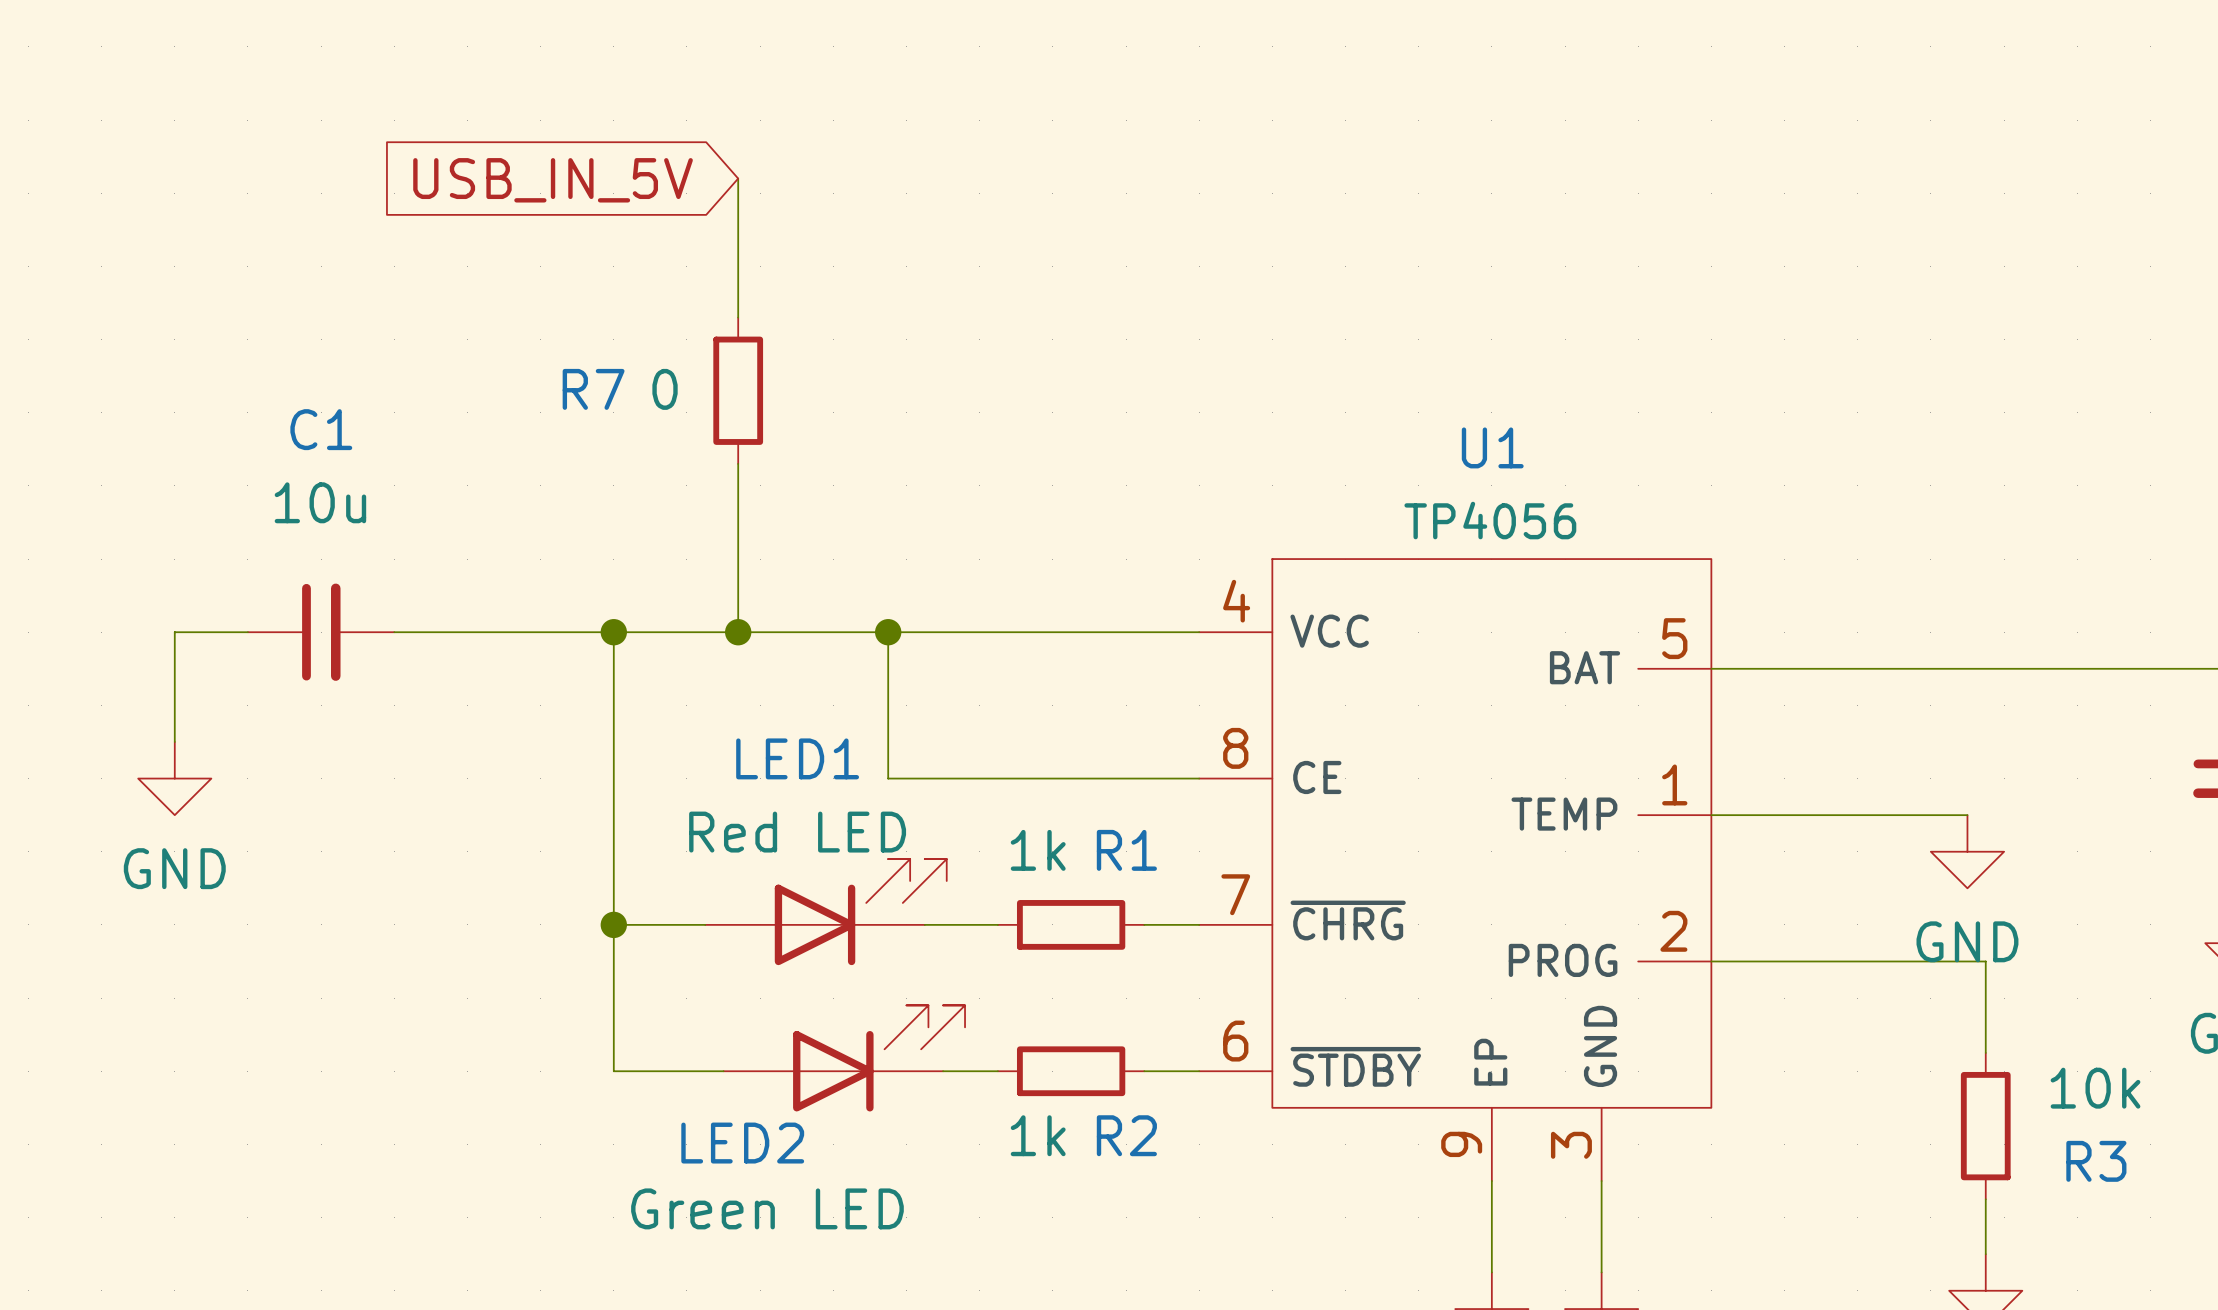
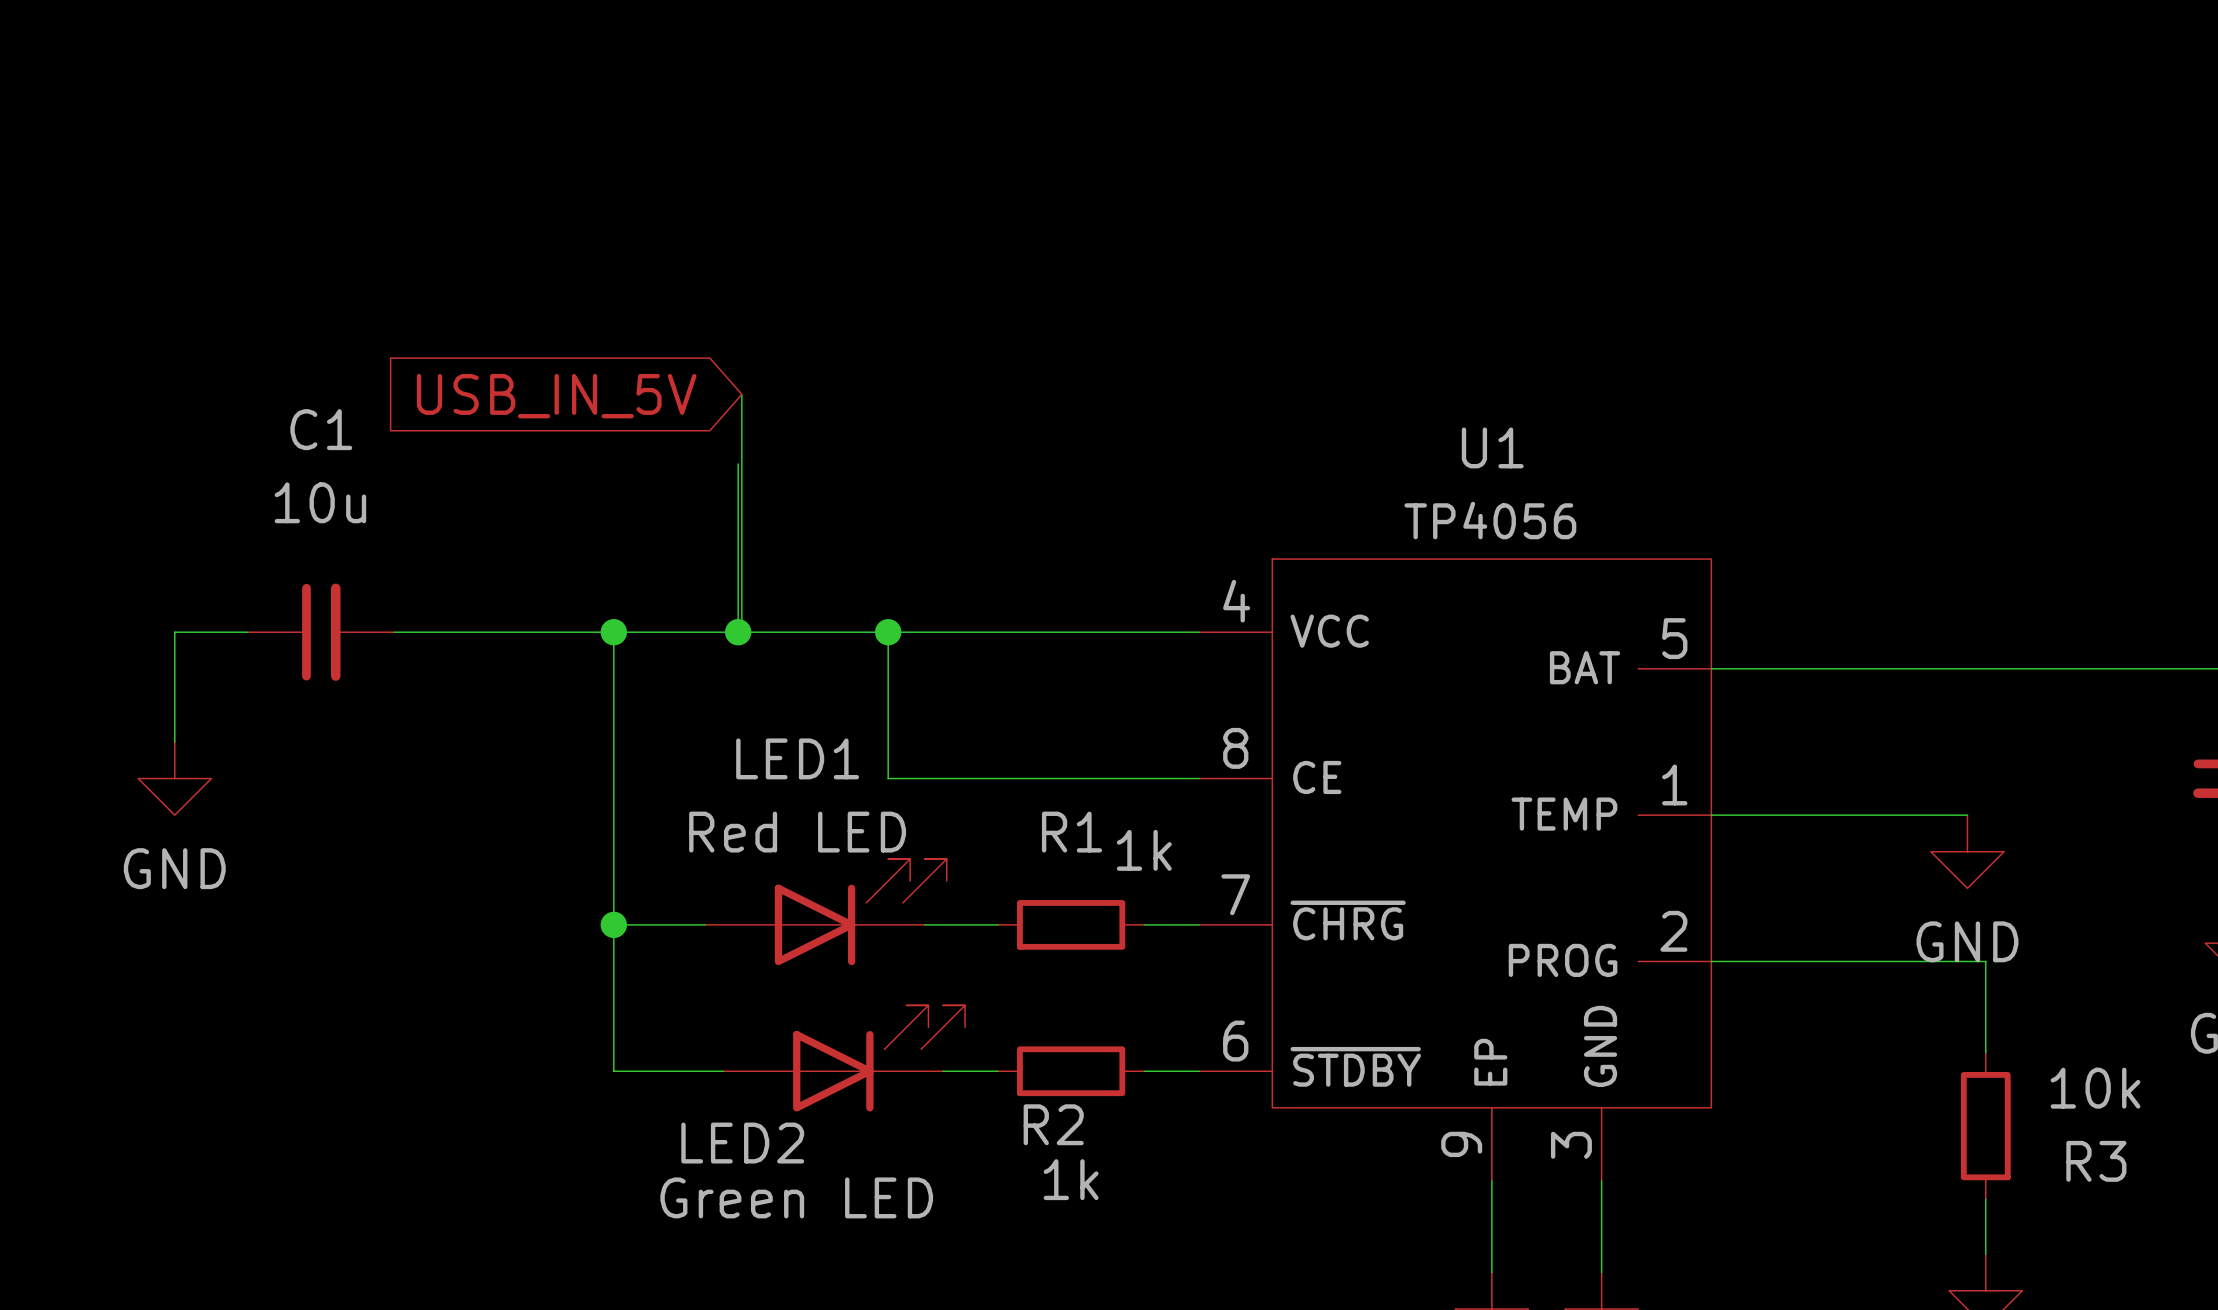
wire: (738, 178) (738, 317) -> none
global label position: USB_IN_5V (553, 180) -> USB_IN_5V (556, 396)
R7: 0 (738, 390) -> none
wire: none -> (741, 394) (741, 632)
R1 value position: 1k (1038, 850) -> 1k (1144, 850)
R1 name position: R1 (1126, 850) -> R1 (1071, 832)
R2 value position: 1k (1038, 1135) -> 1k (1071, 1179)
R2 name position: R2 (1126, 1135) -> R2 (1053, 1124)
LED2 value position: Green LED (767, 1208) -> Green LED (796, 1197)

